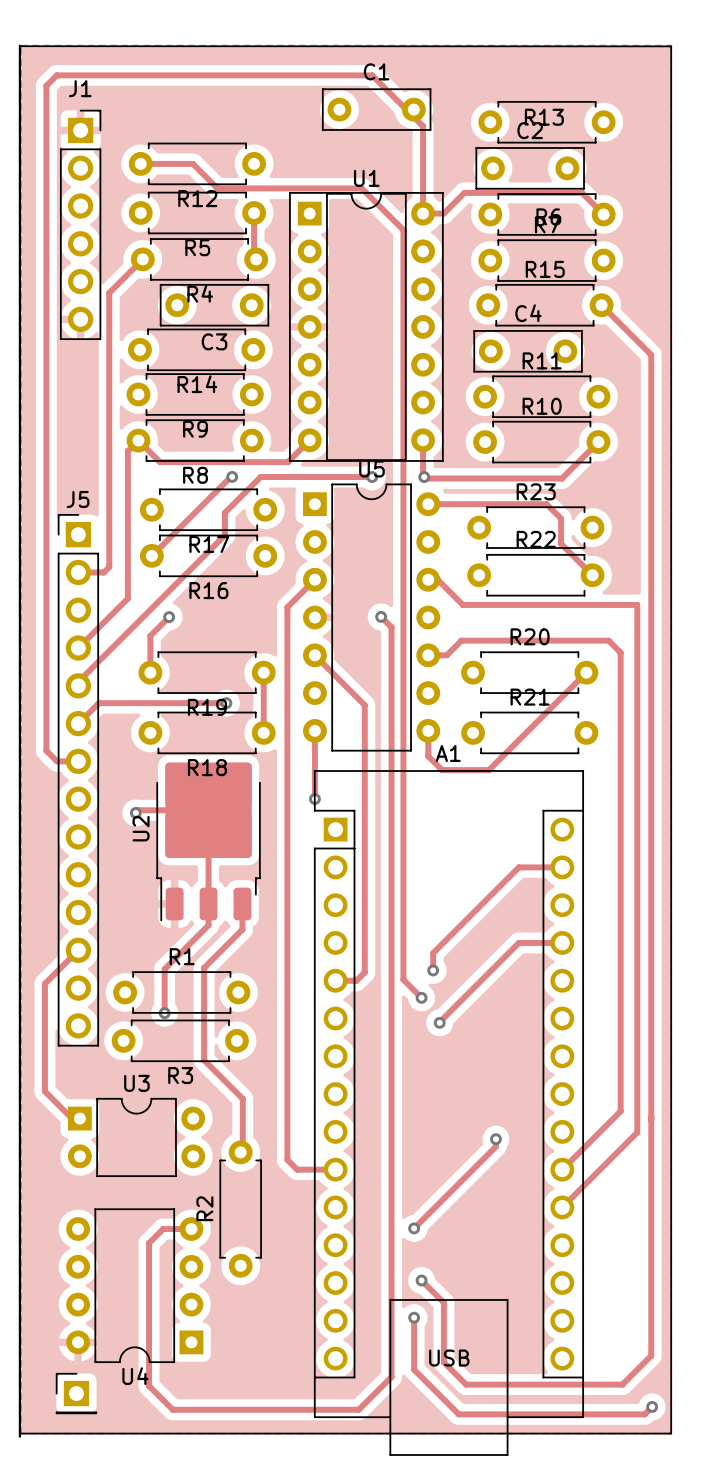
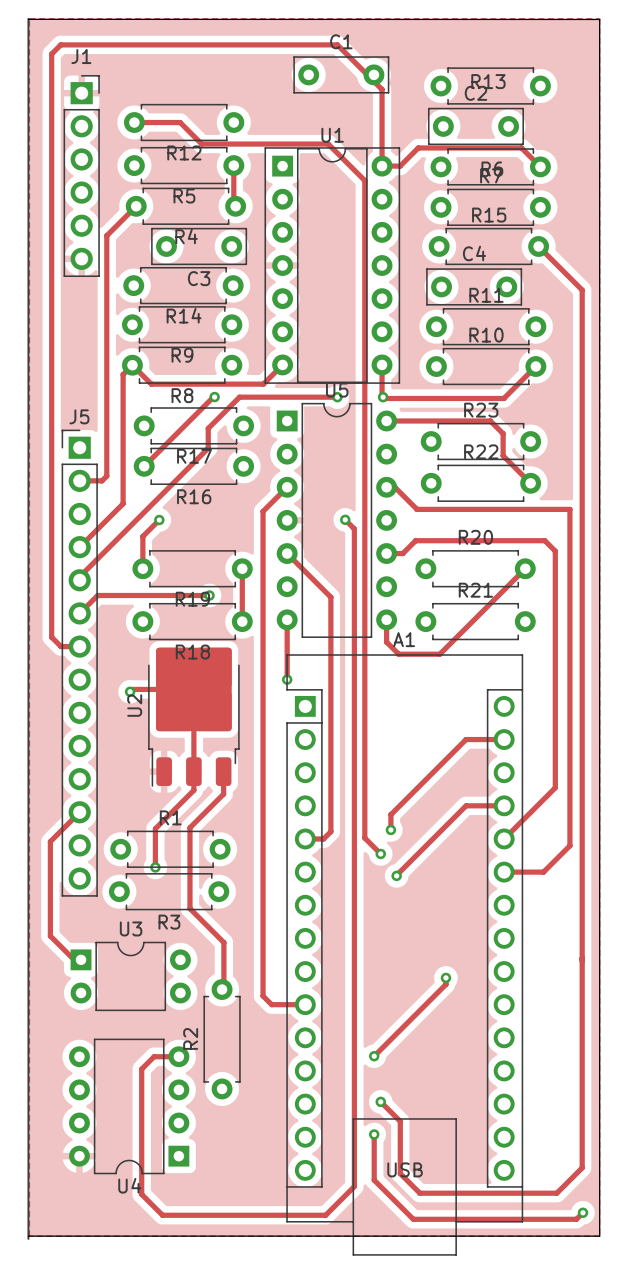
track: (620, 922) (620, 1111) (562, 1169) -> (555, 787) (504, 838)
track: (637, 988) (637, 1132) (562, 1207) -> (569, 845) (543, 872) (504, 872)
part: (76, 1393) -> none

